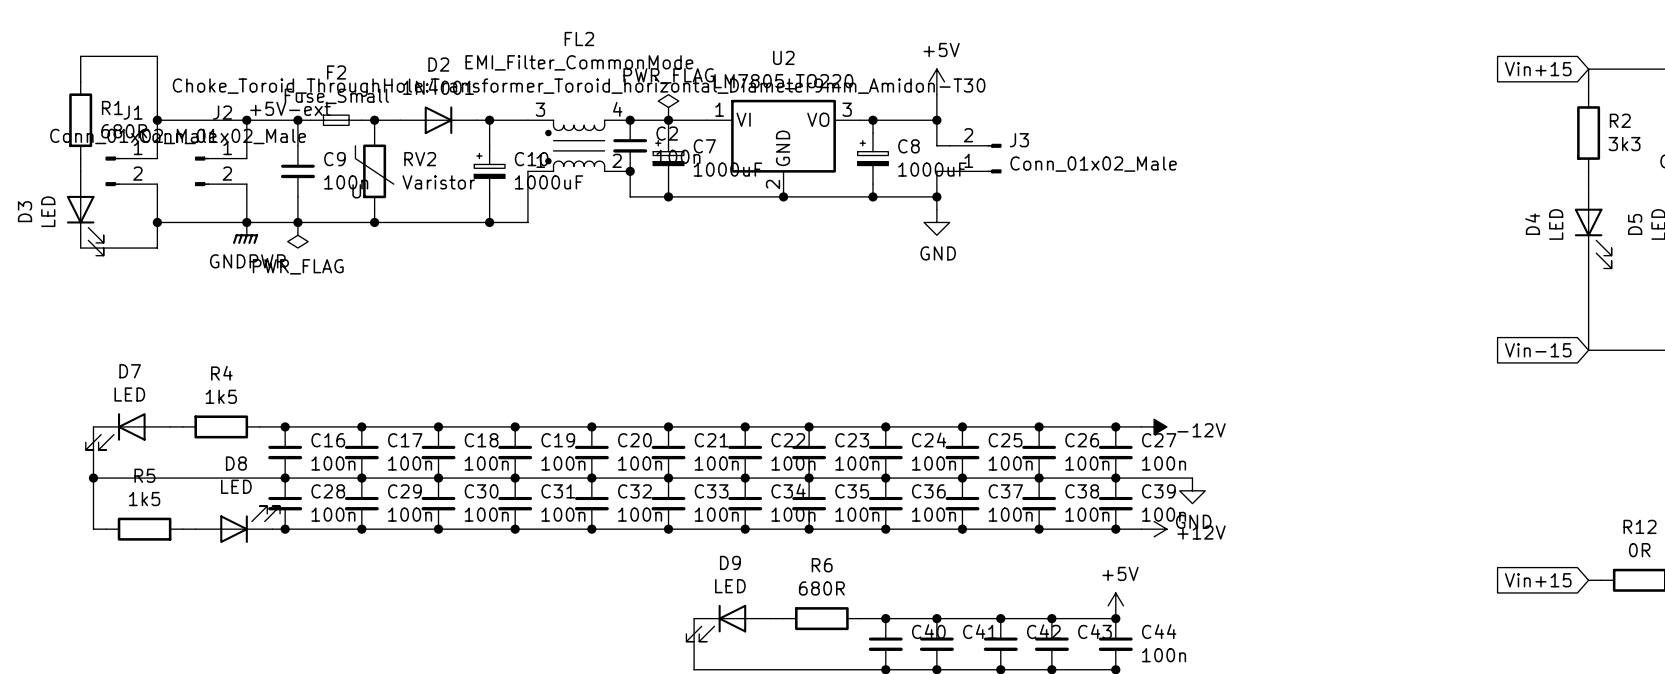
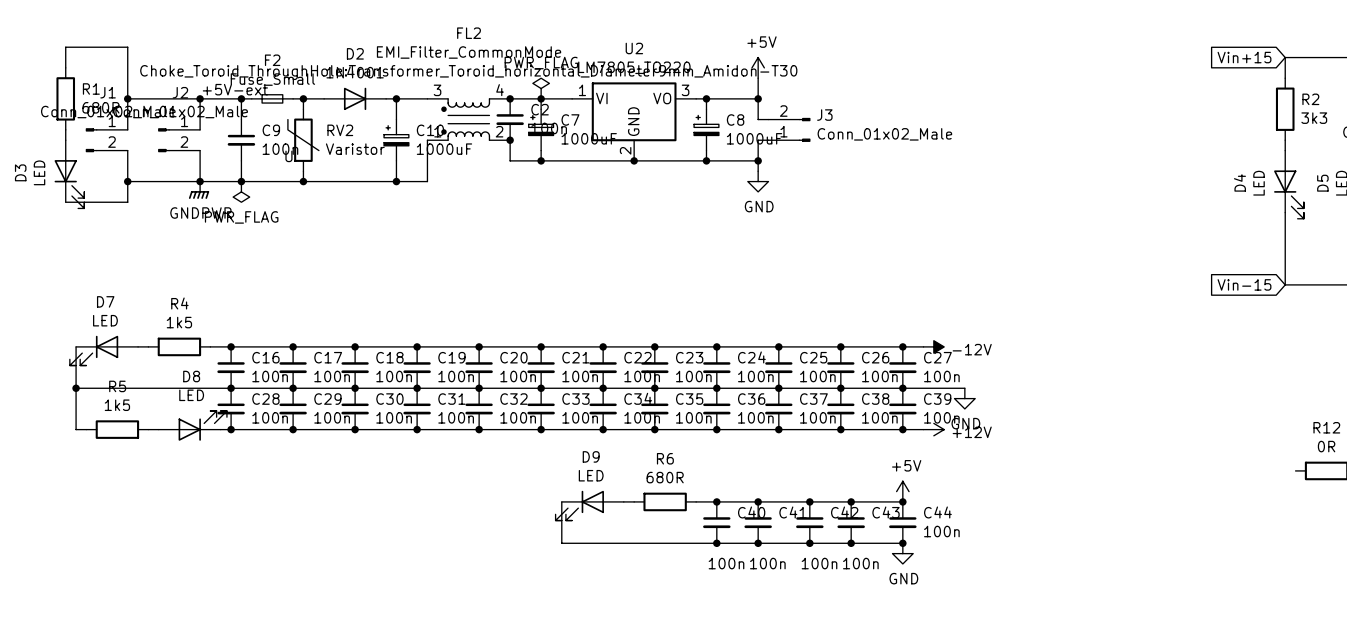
global label: Vin+15 (1538, 580) -> none
wire: (1588, 580) (1601, 580) -> none

